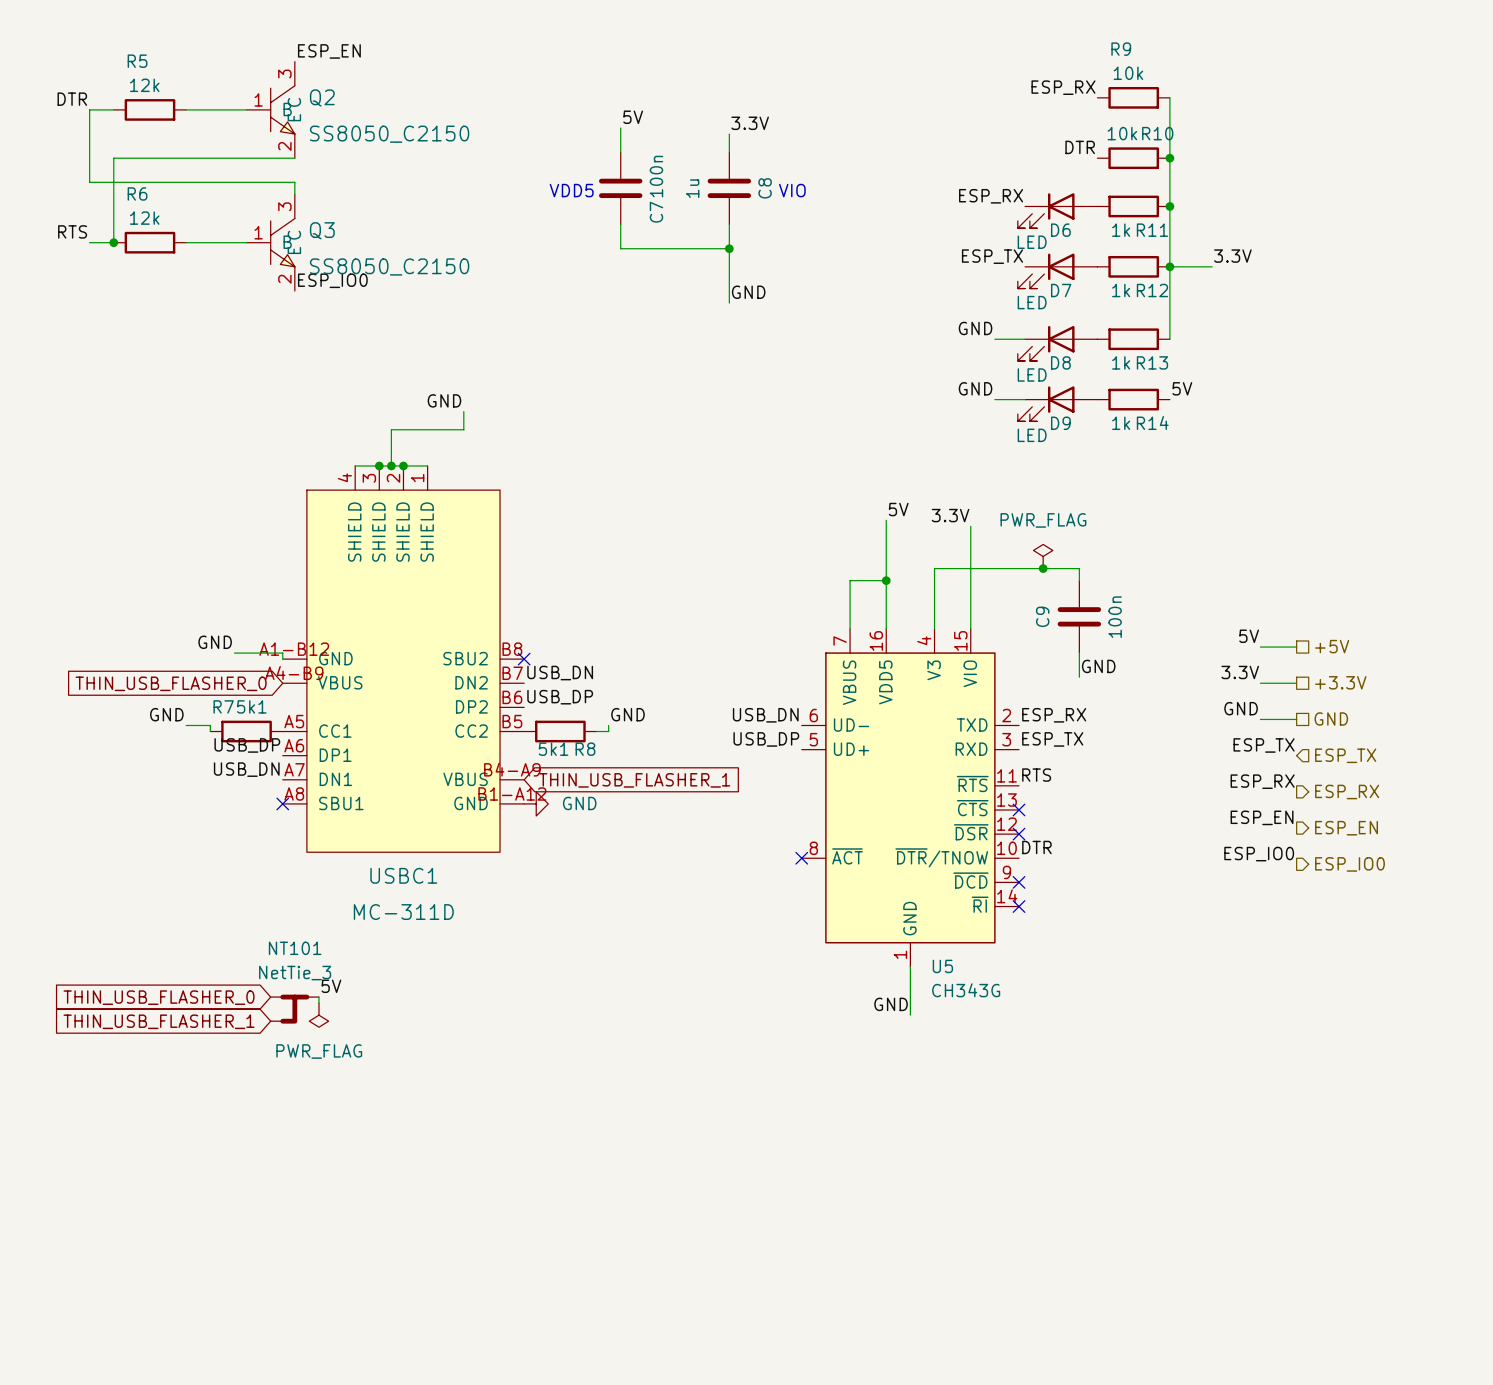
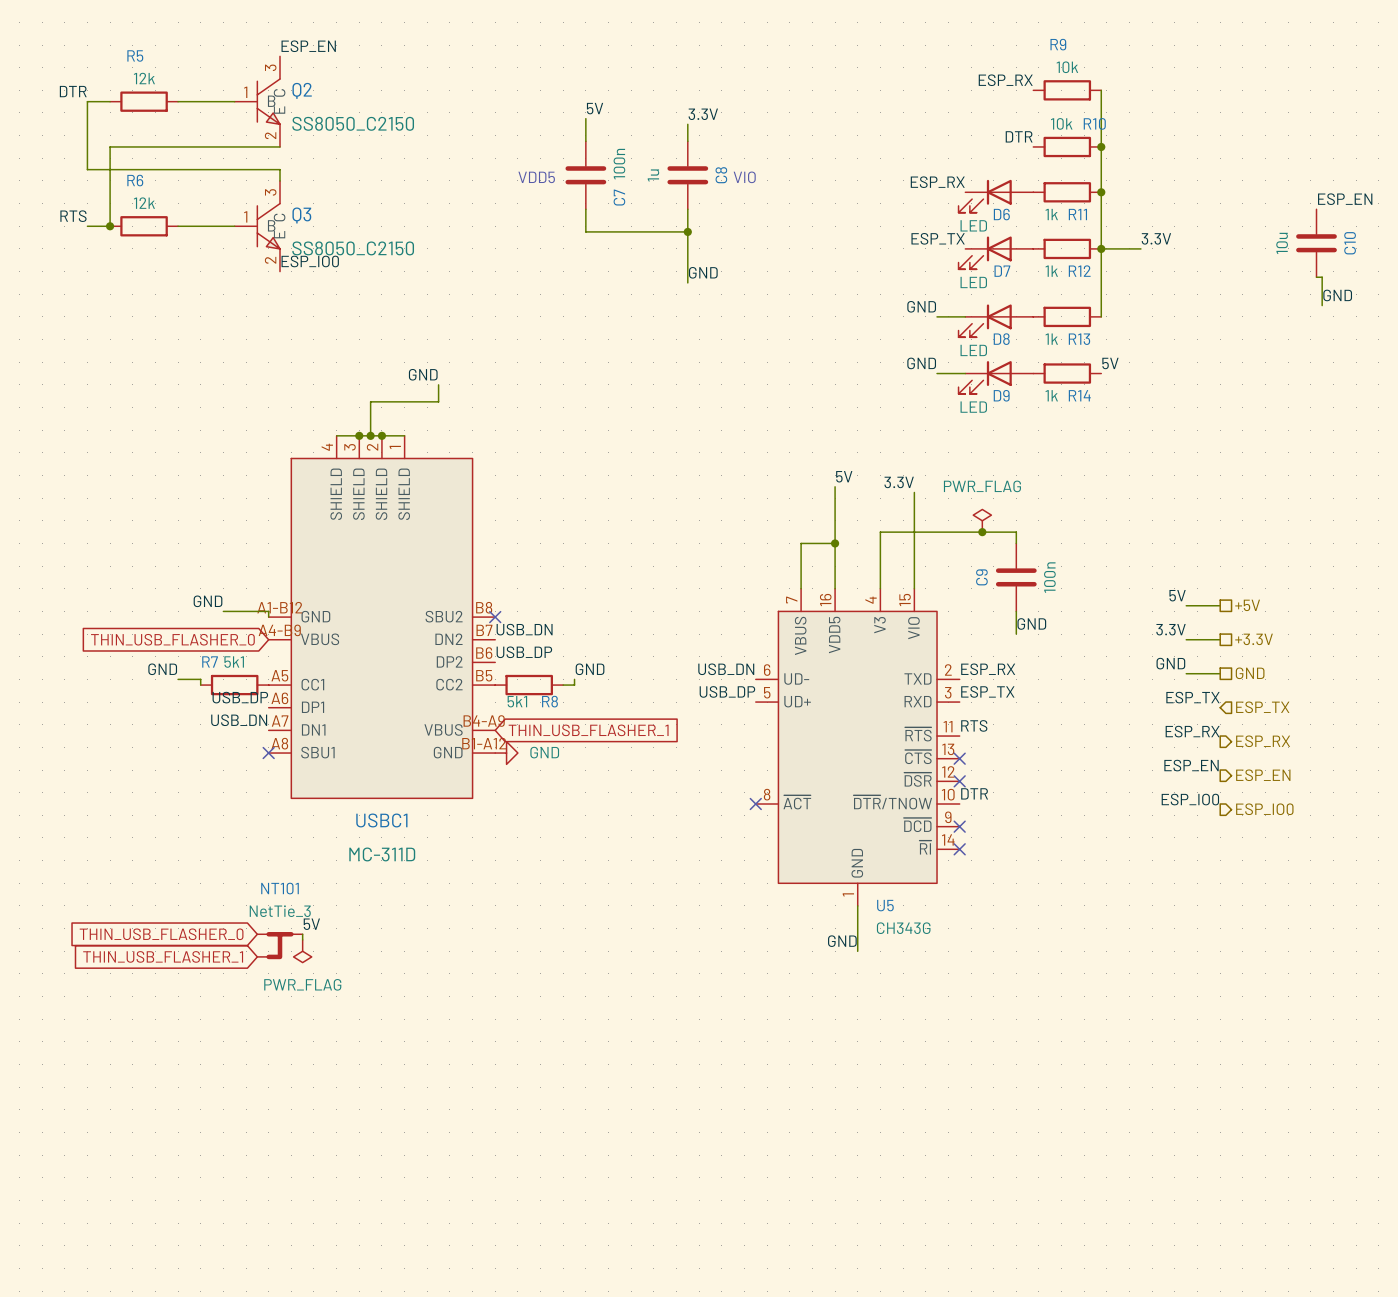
label: none -> ESP_EN (1345, 199)
C10: none -> 10u (1316, 243)
wire: none -> (1316, 277) (1322, 277) (1322, 305)
label: none -> GND (1337, 295)

